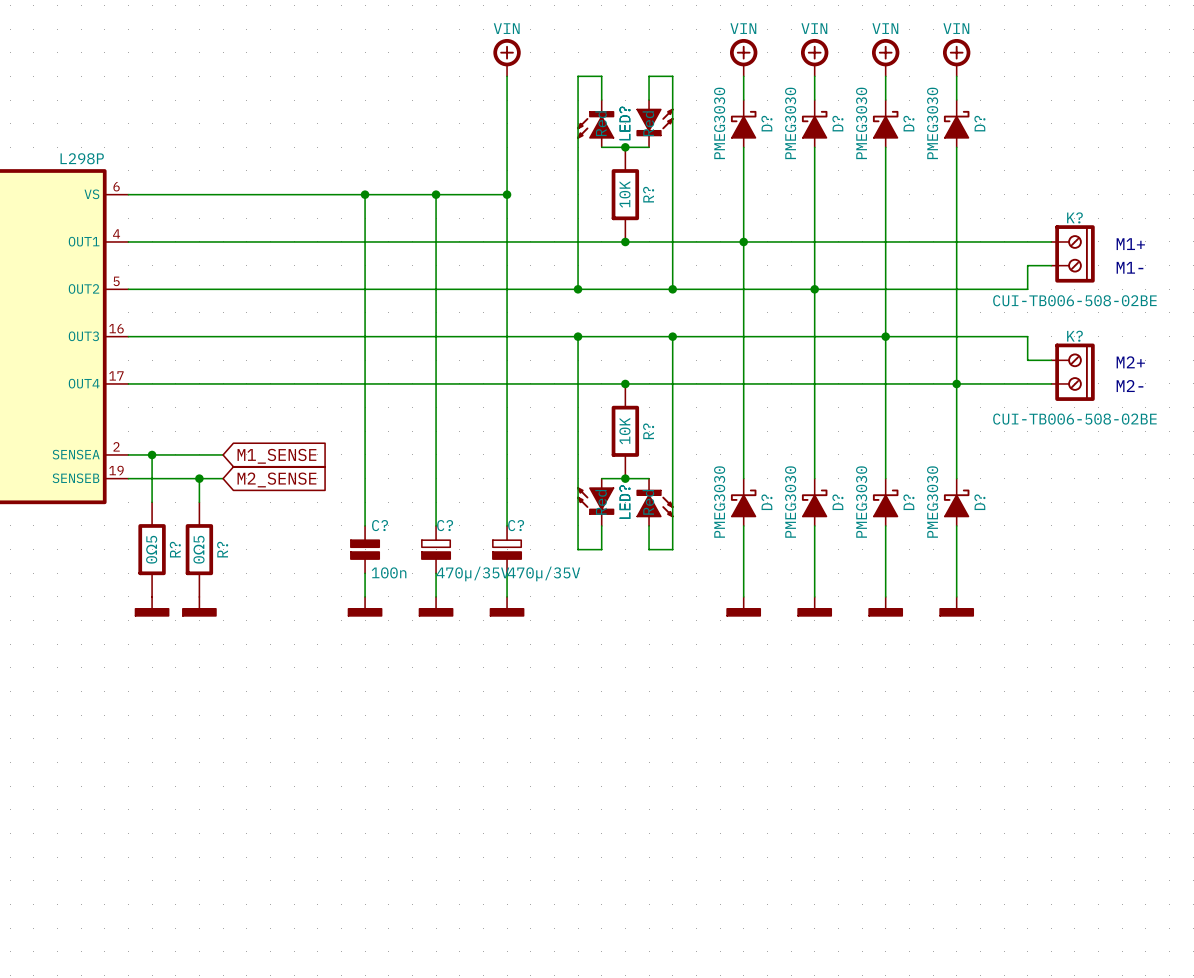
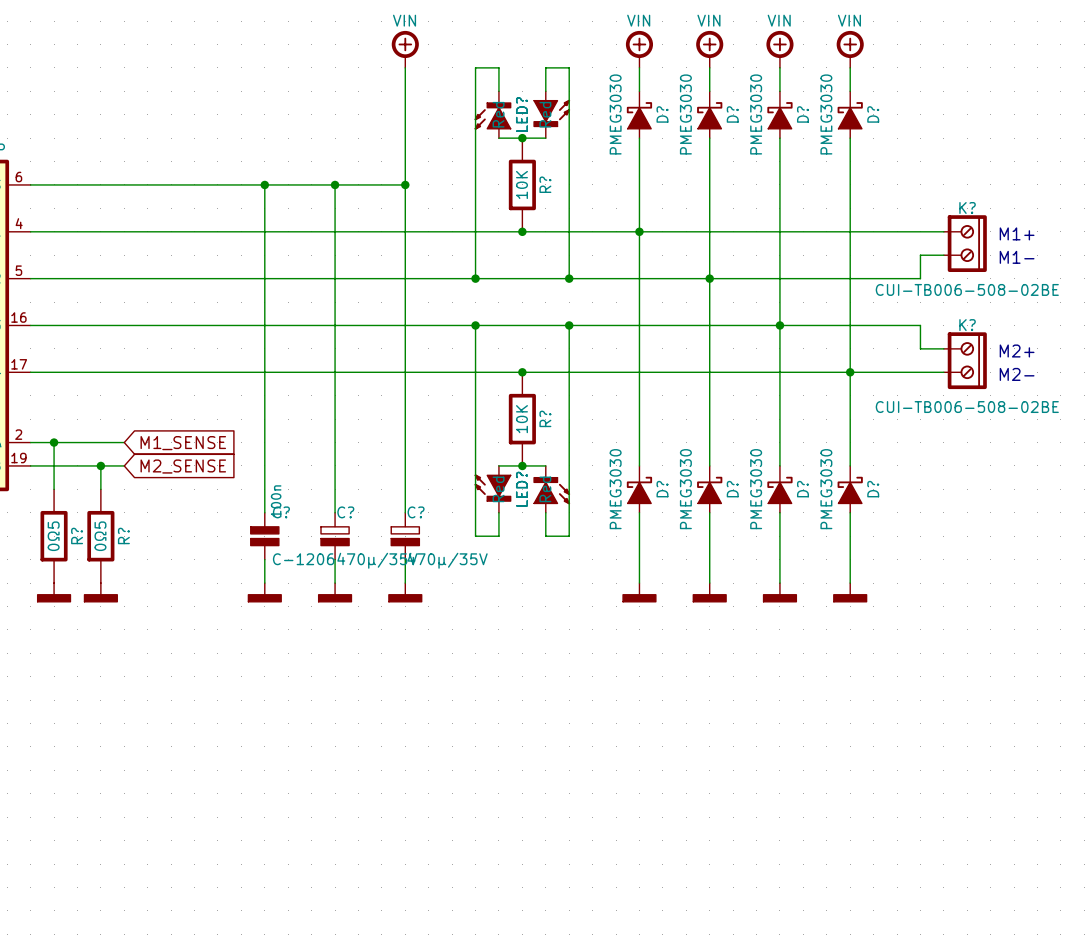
C? text: none -> 100n (276, 501)
C? value: 100n (389, 572) -> C-1206 (303, 559)

